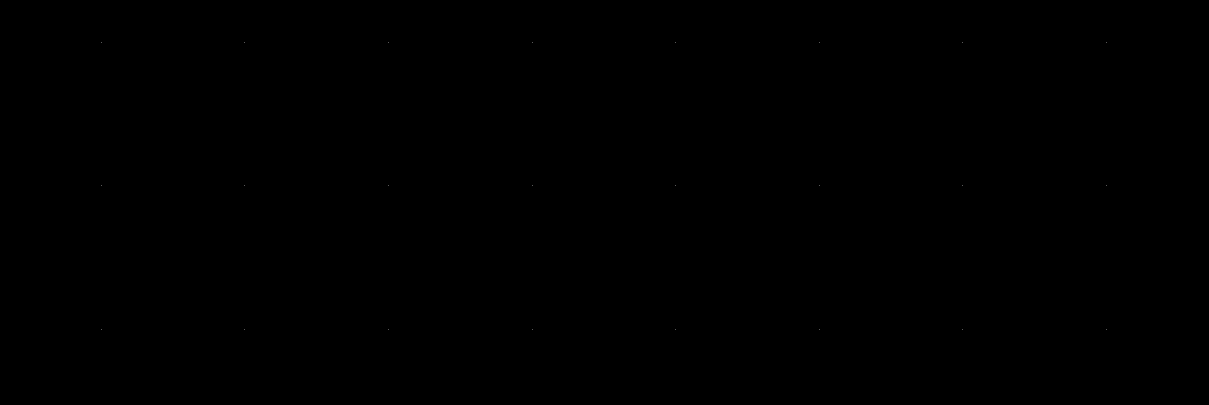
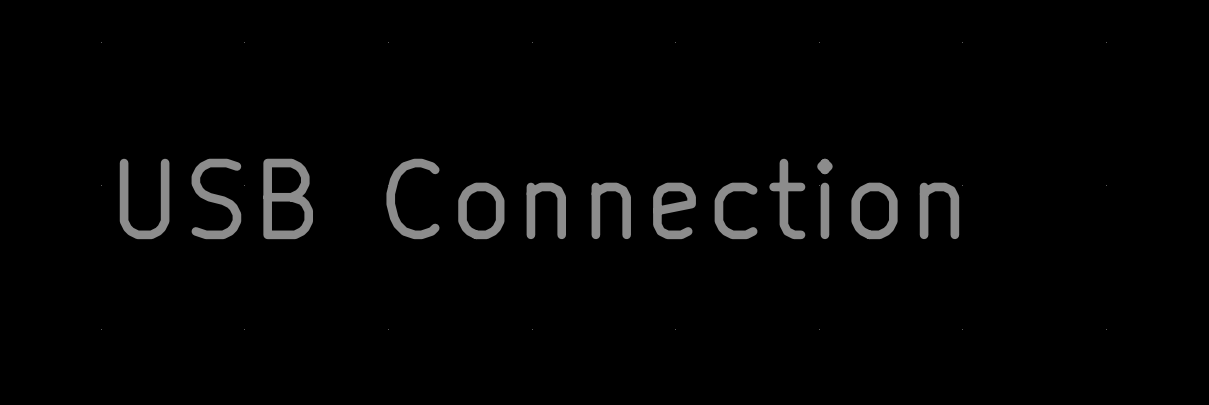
text: none -> USB Connection (539, 198)

